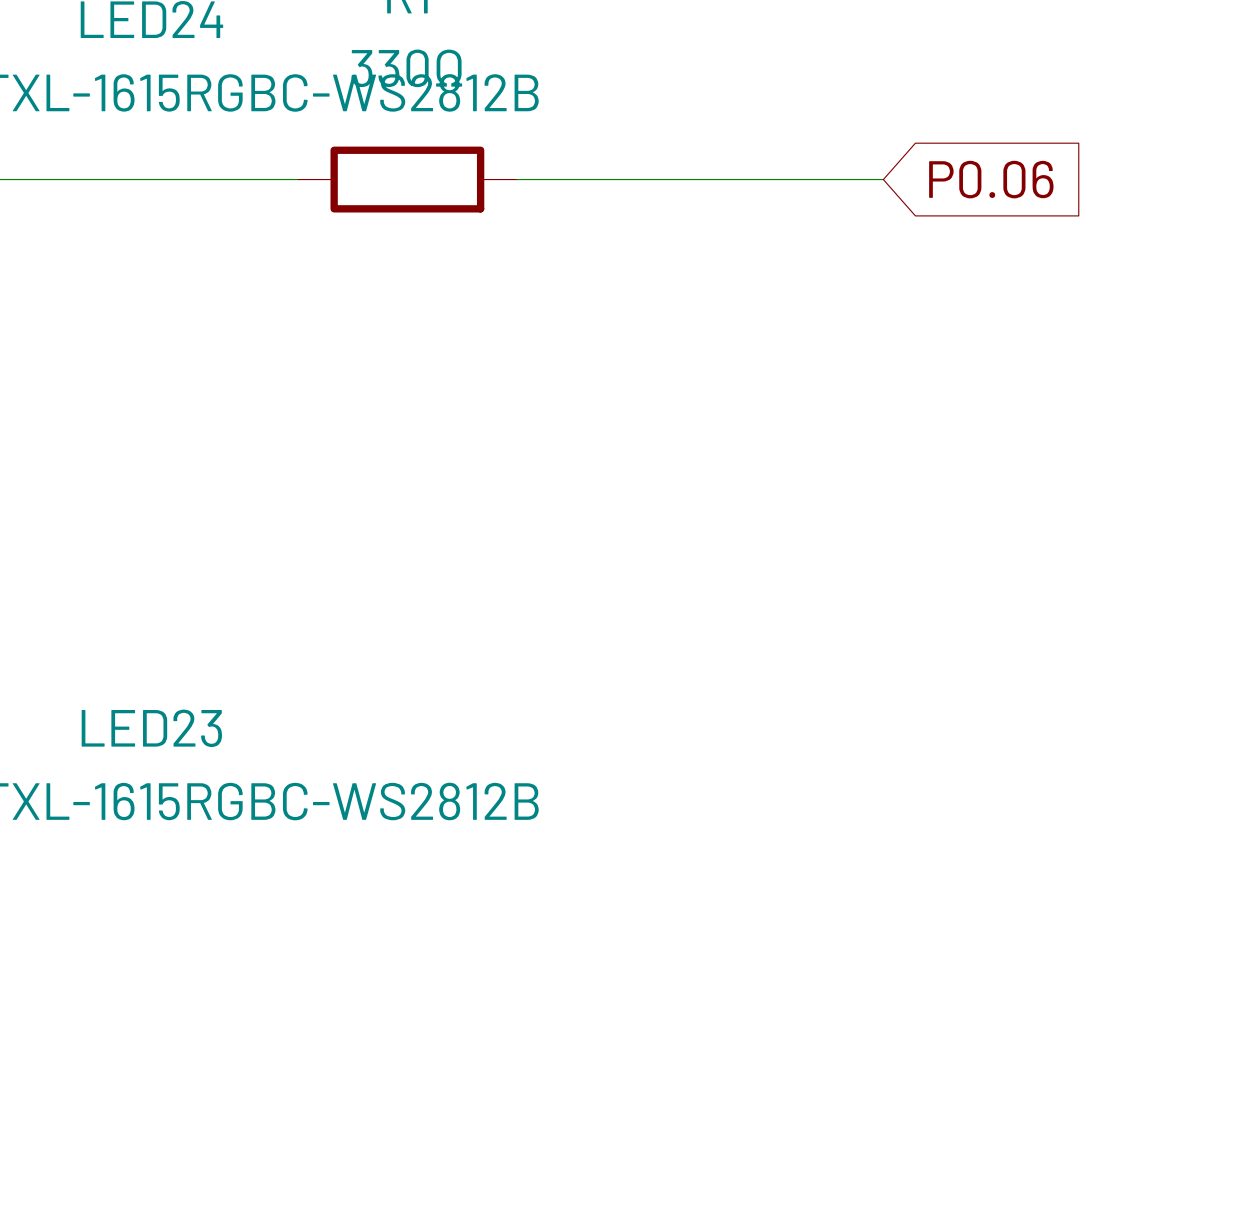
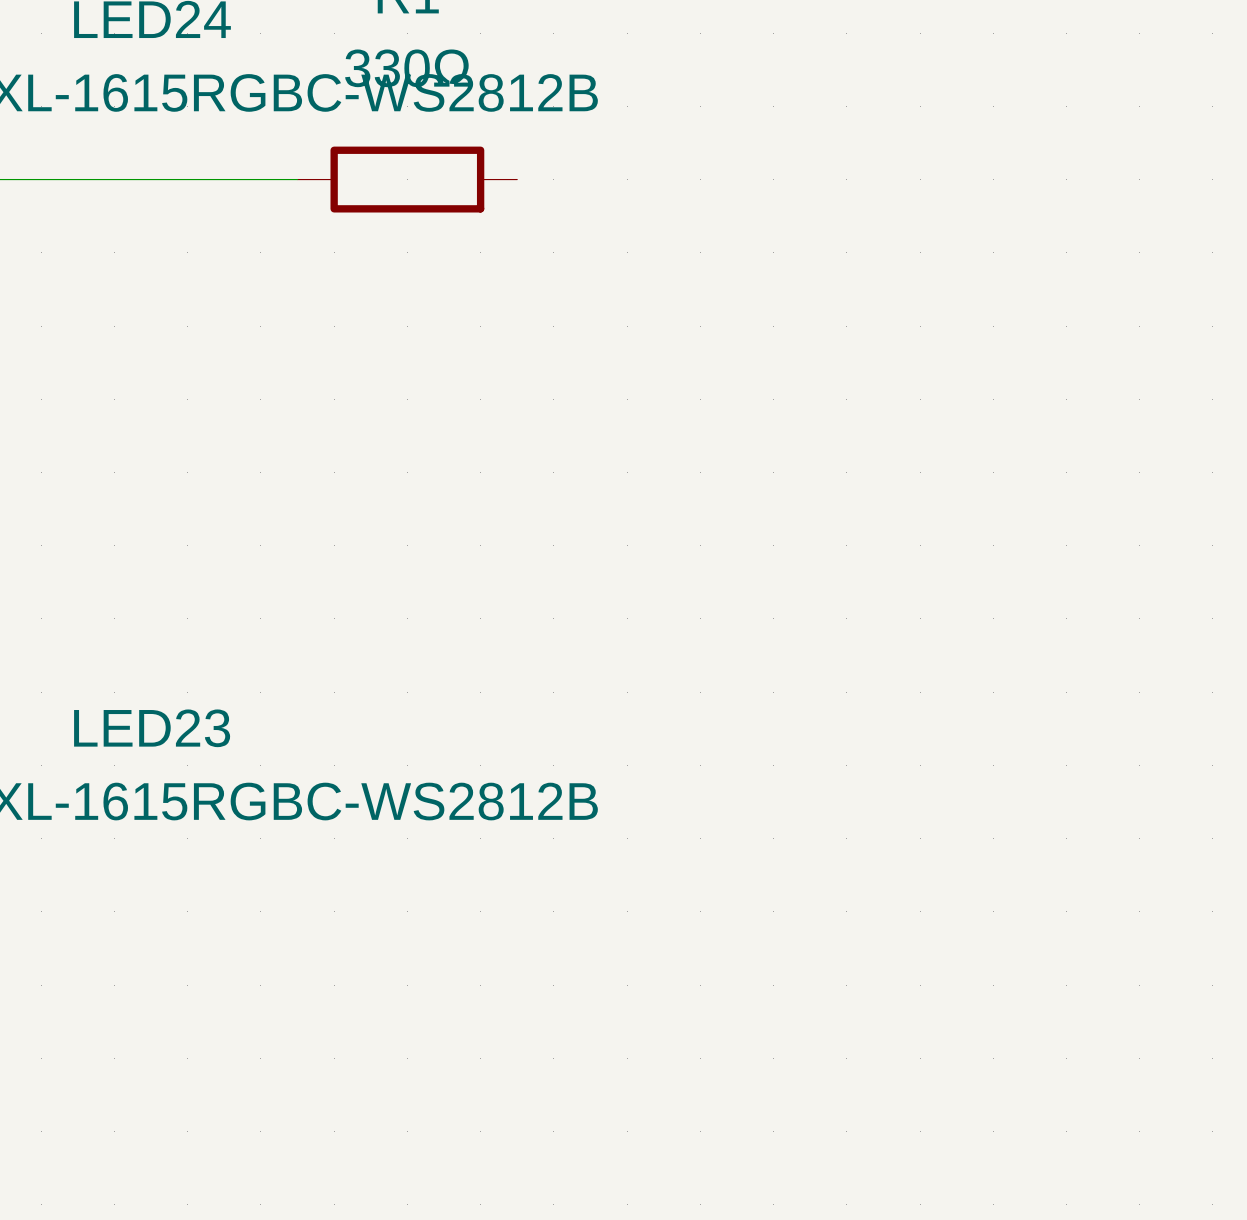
wire: (517, 179) (883, 179) -> none
global label: P0.06 (991, 179) -> none

